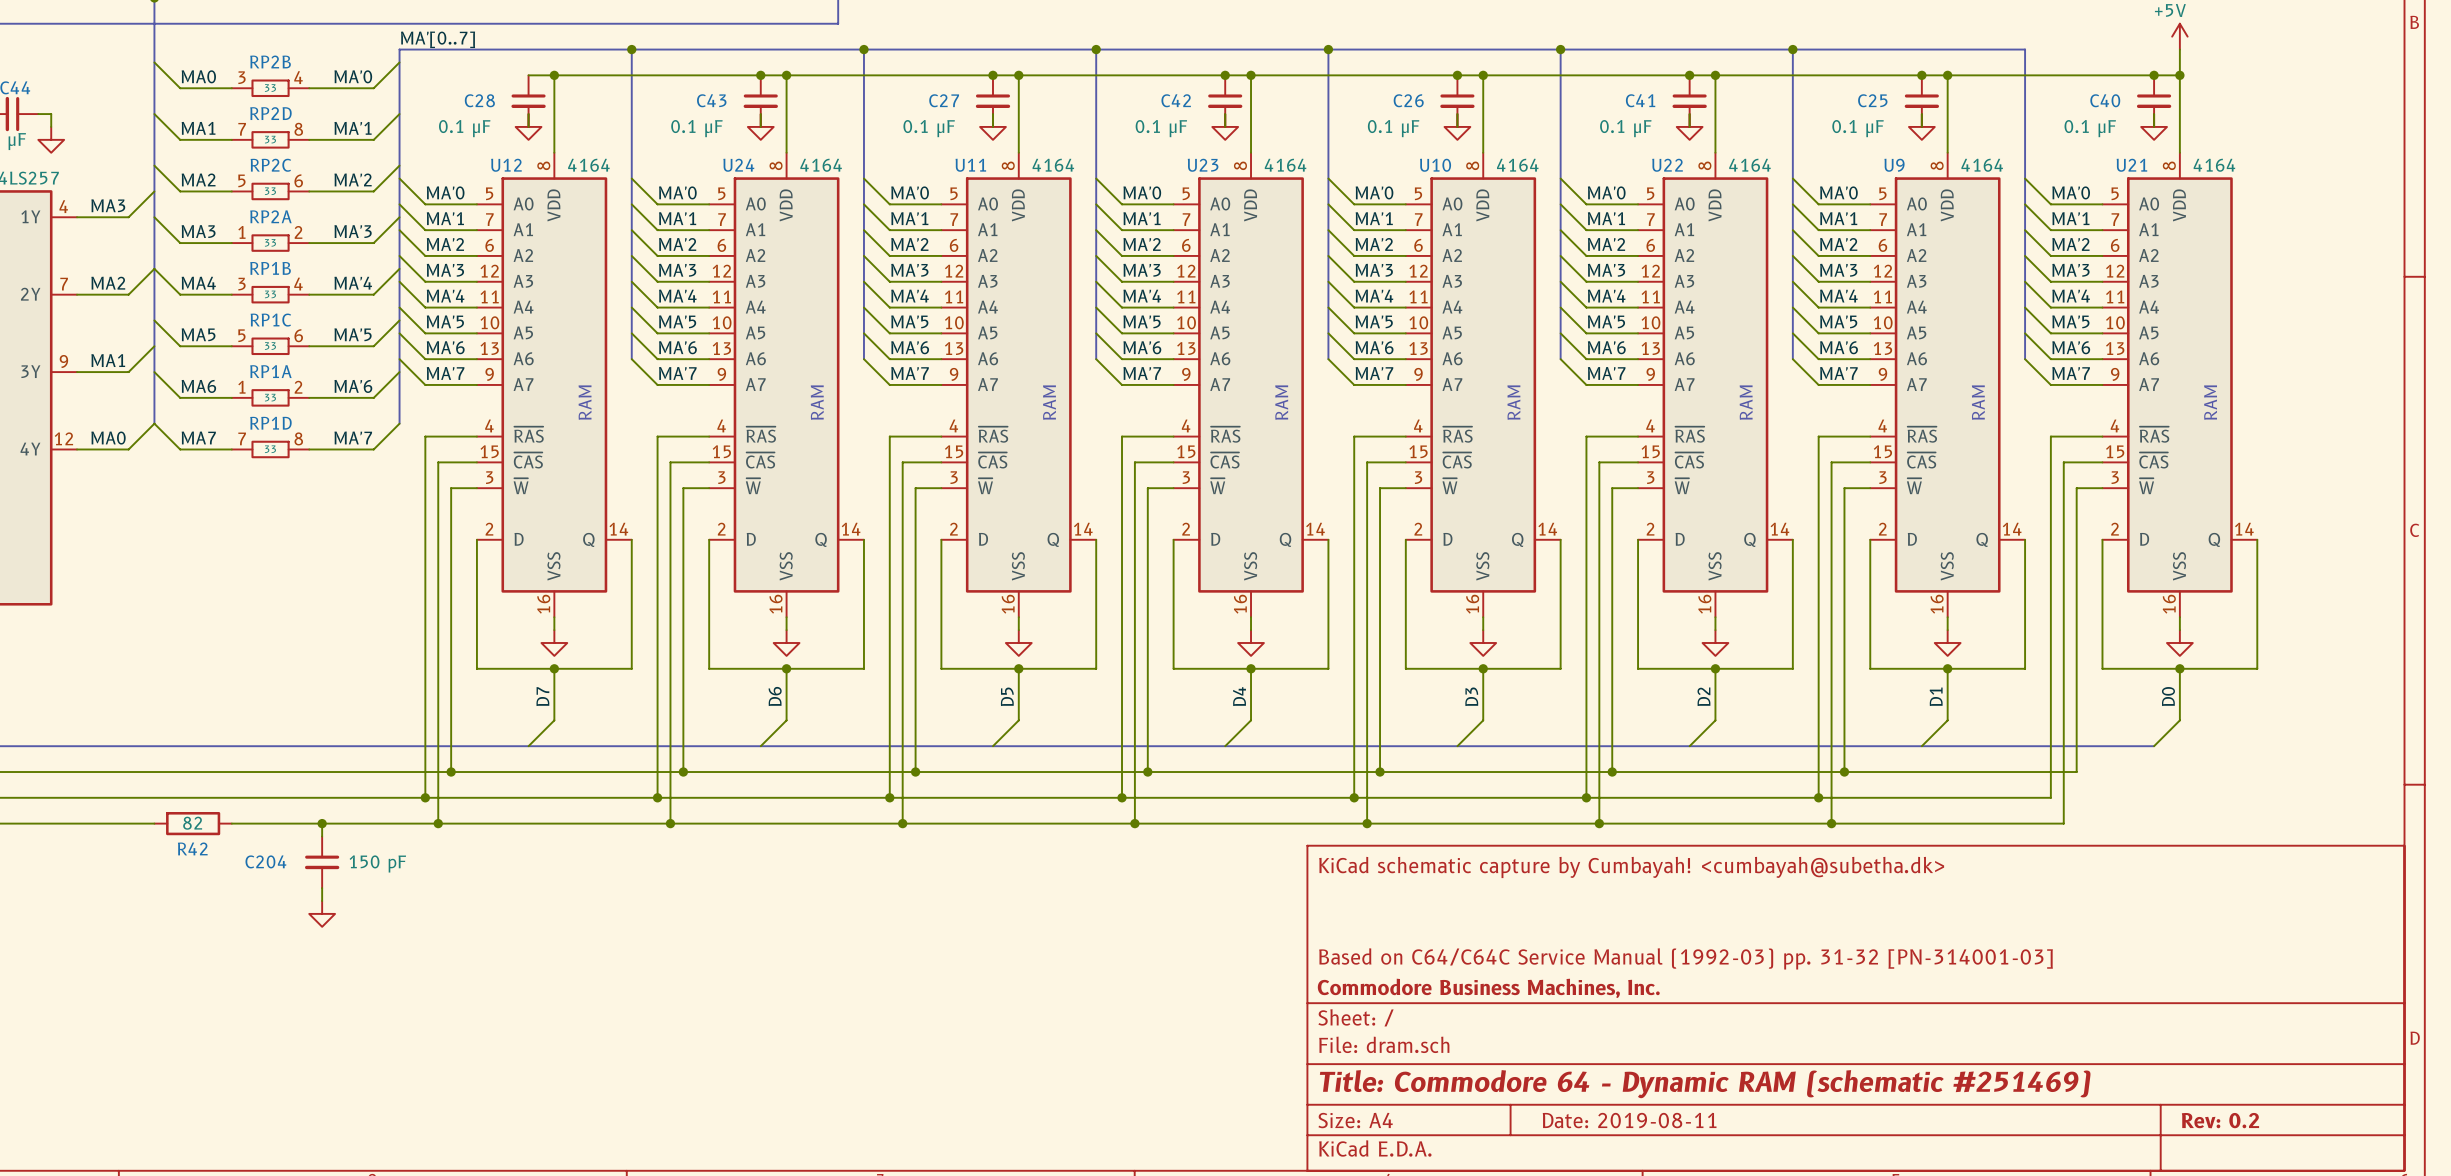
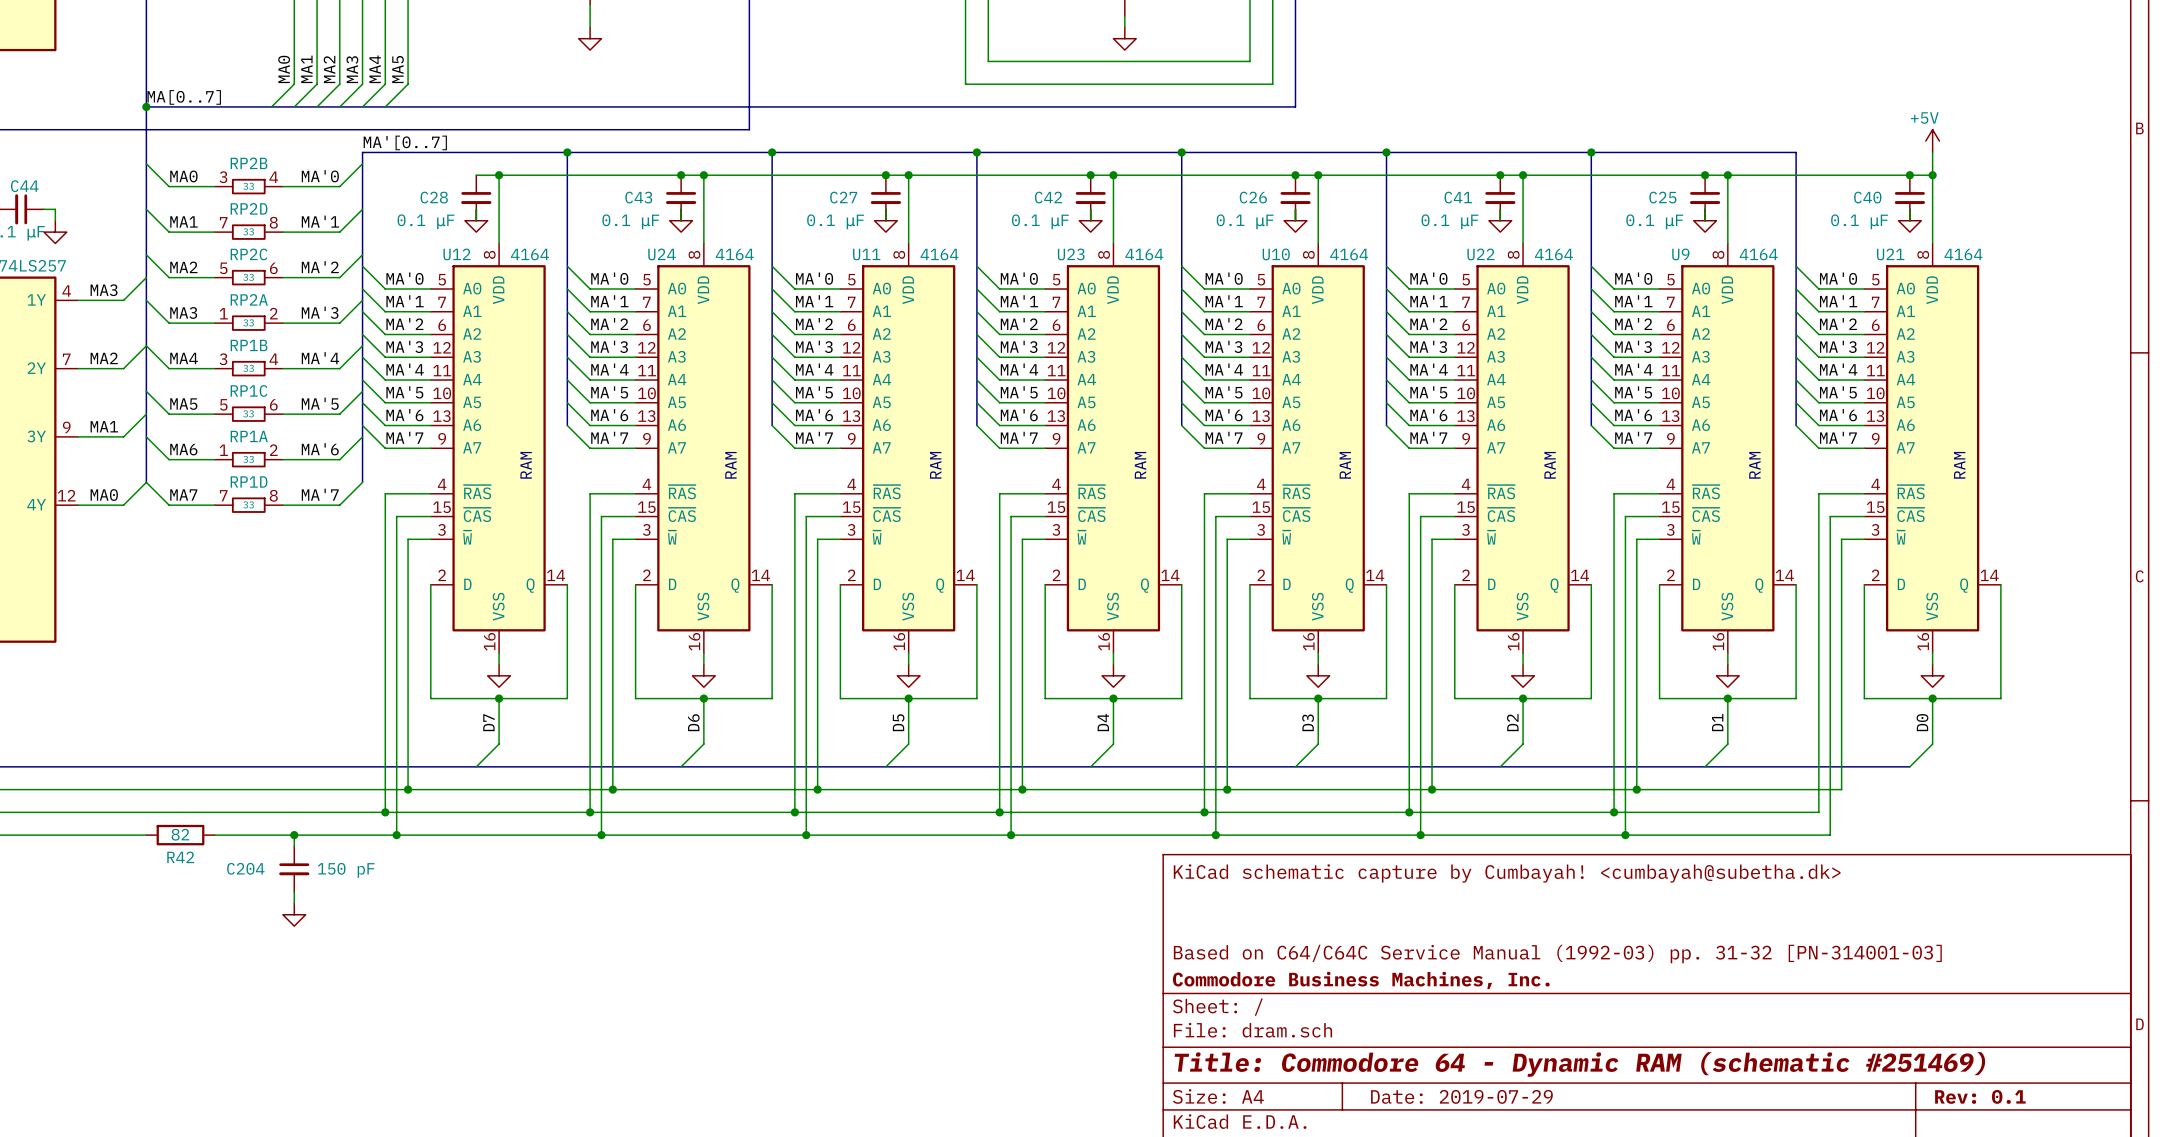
title block: Date: 2019-08-11 (1629, 1120) -> Date: 2019-07-29 (1461, 1096)
title block: Rev: 0.2 (2220, 1120) -> Rev: 0.1 (1980, 1096)

